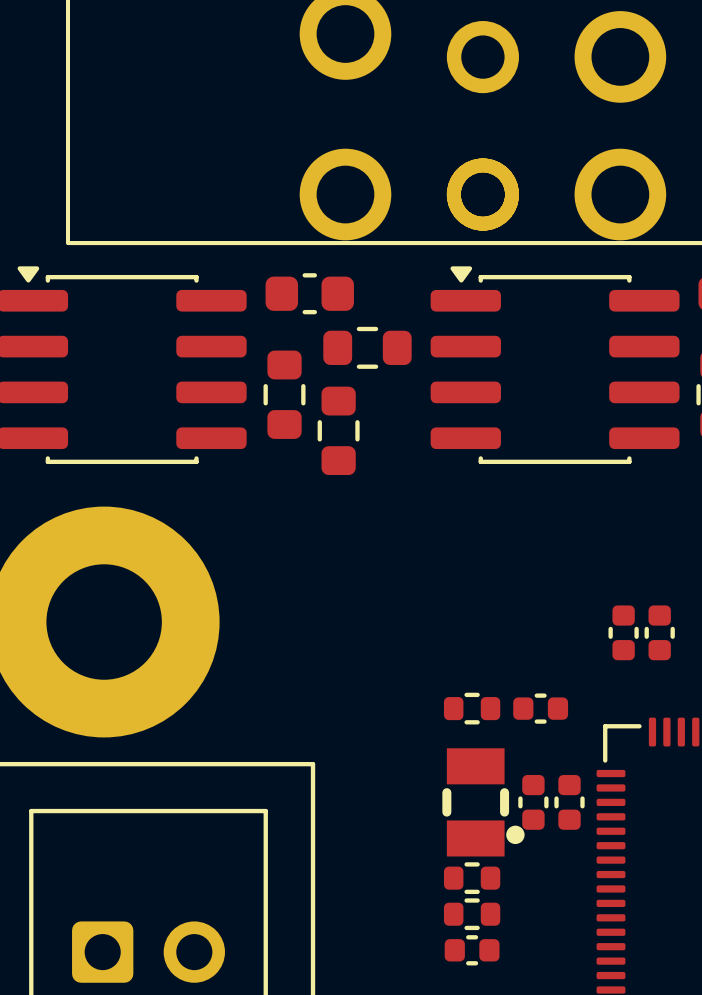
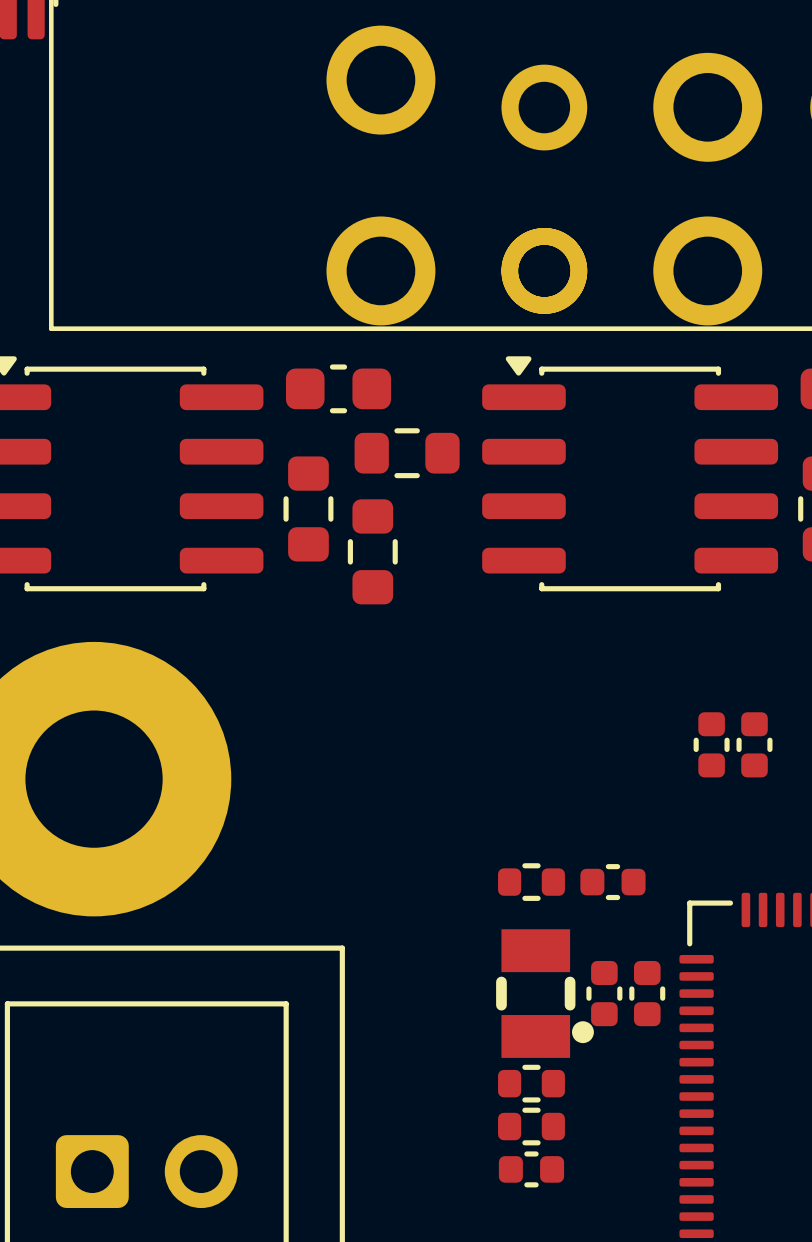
part: none -> (711, 744)
part: none -> (754, 744)
part: (623, 632) -> none
part: (659, 632) -> none

